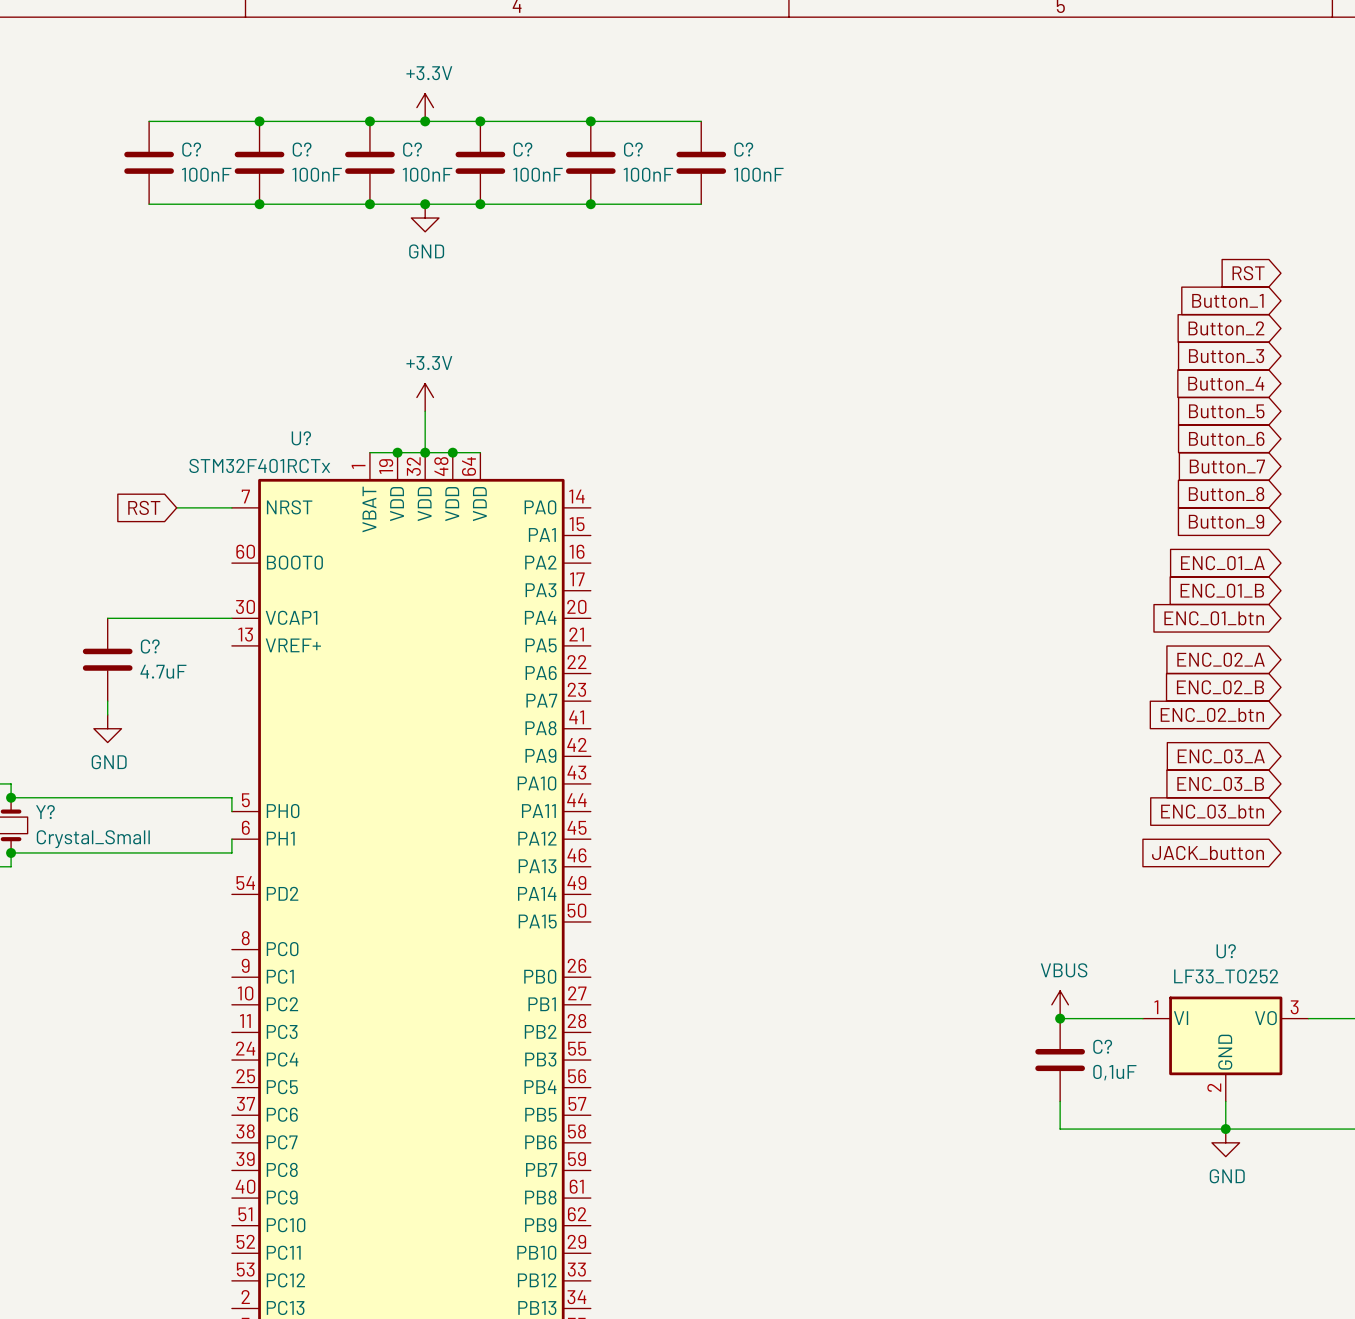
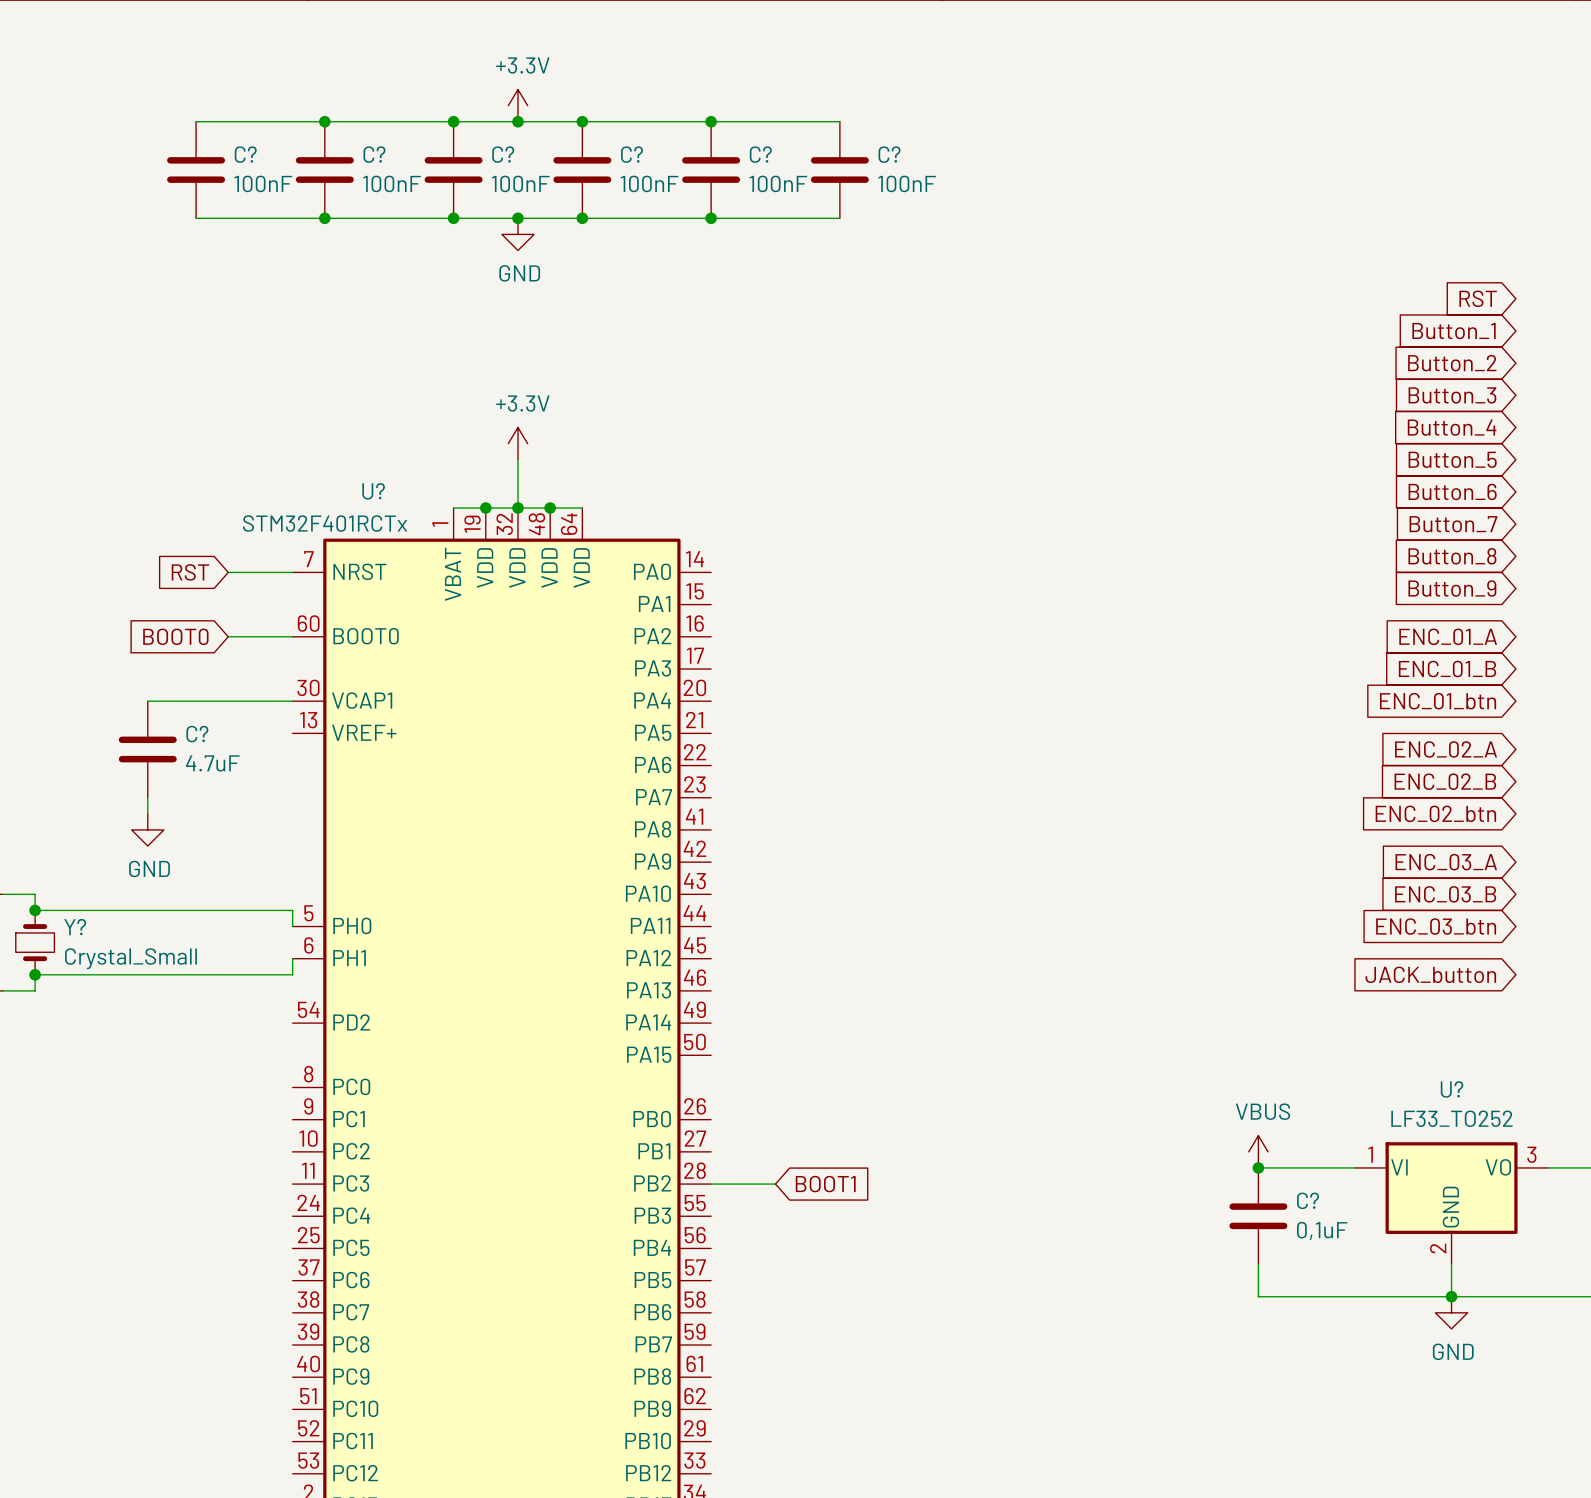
global label: none -> BOOT0 (175, 636)
wire: none -> (228, 636) (292, 636)
wire: none -> (711, 1184) (775, 1184)
global label: none -> BOOT1 (825, 1184)

